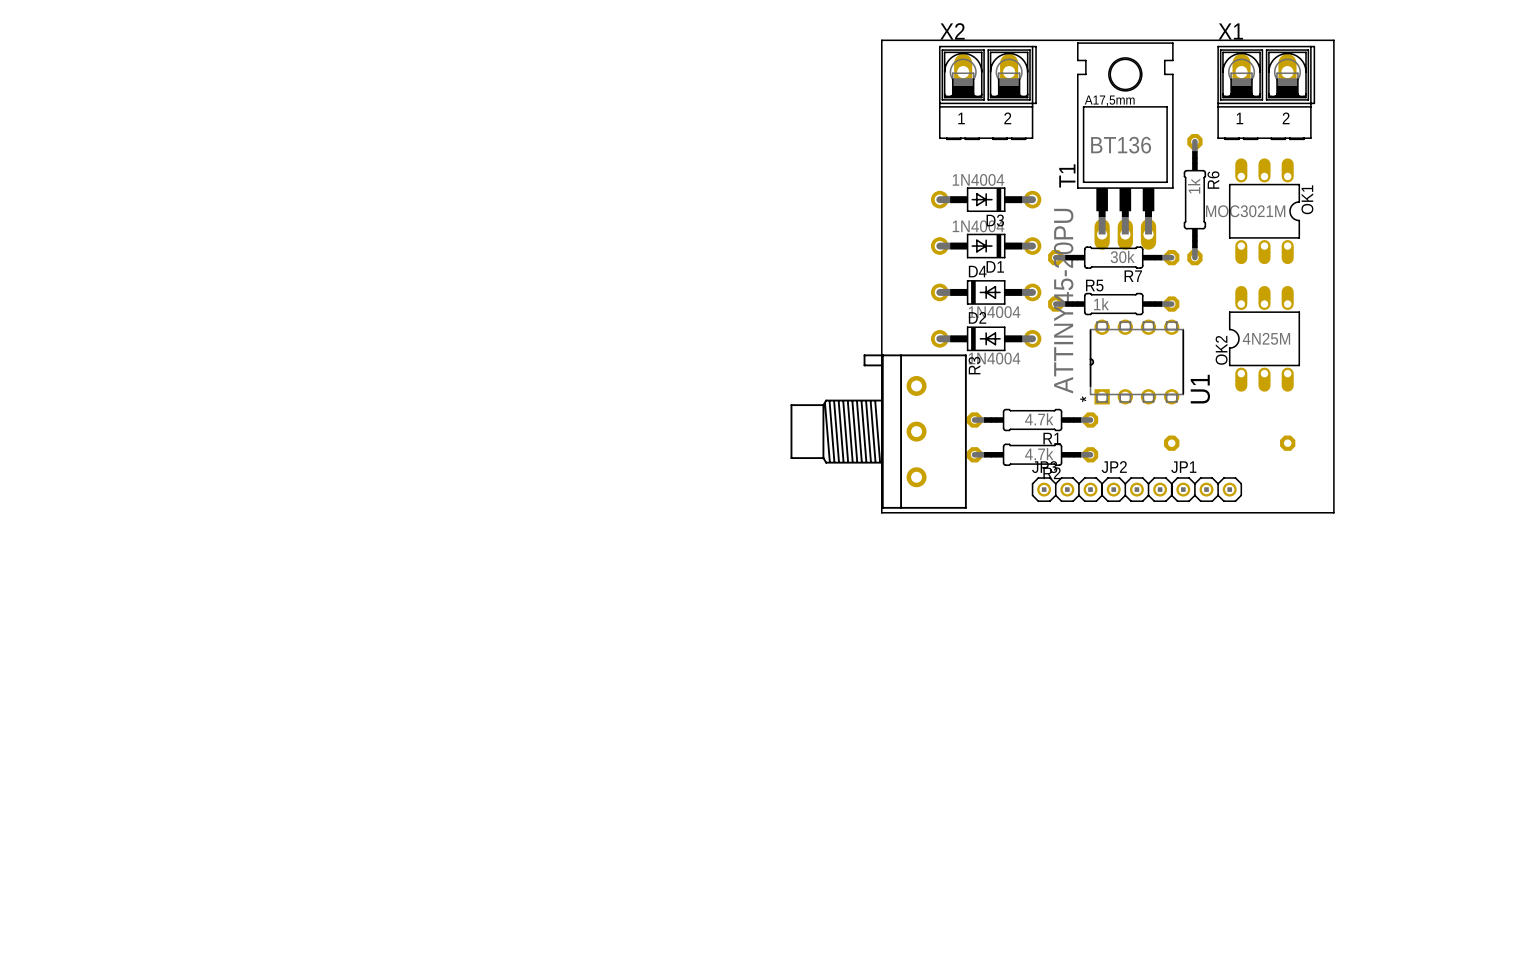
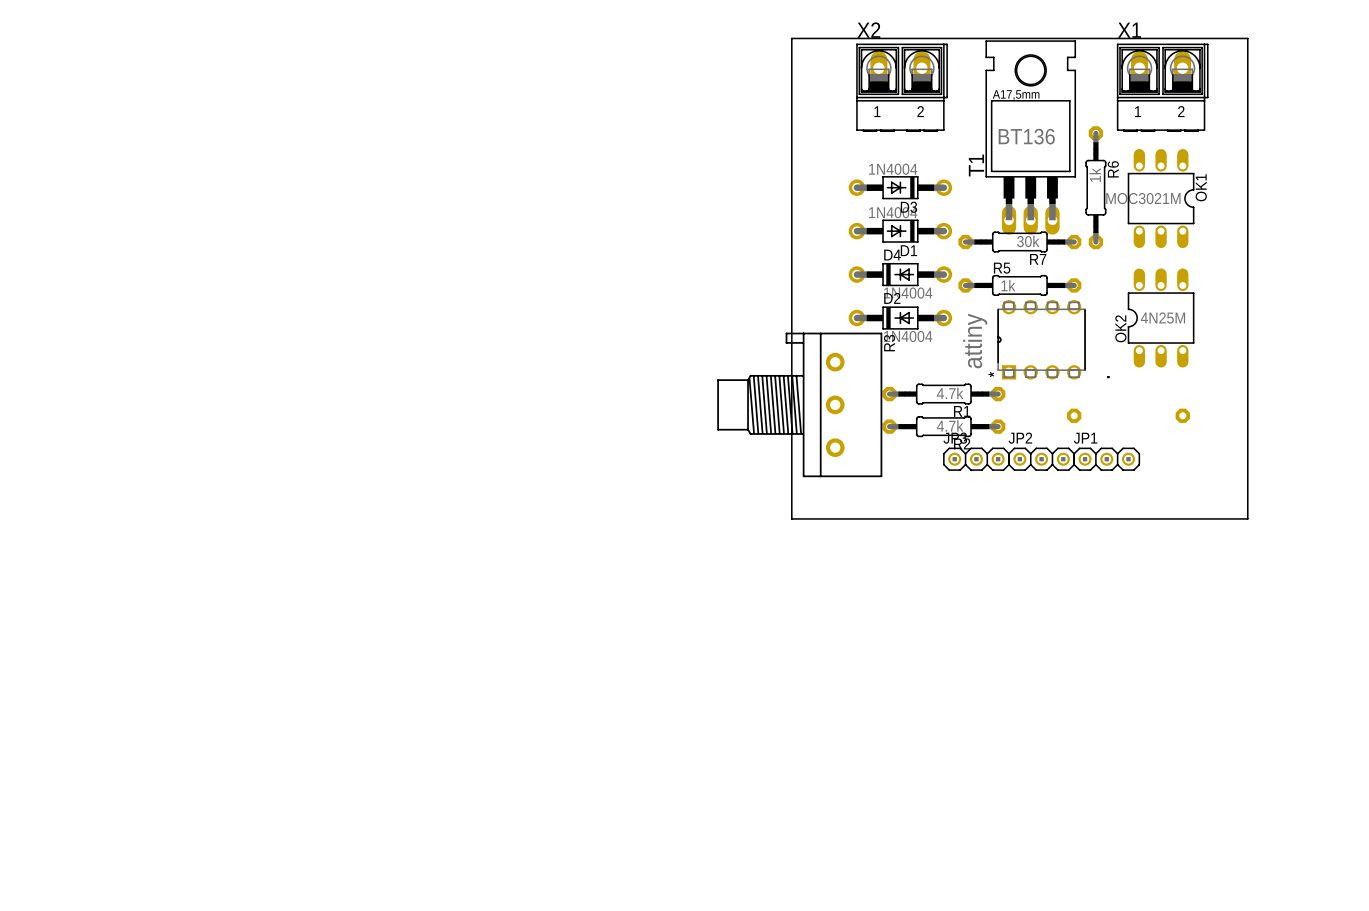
board edge: (881, 40) (881, 512) (1333, 512) (1333, 40) -> (802, 38) (791, 38) (791, 518) (1247, 518) (1247, 38) (1226, 38)
U1 value: ATTINY45-20PU (1063, 301) -> attiny (975, 340)
U1 name: U1 (1200, 389) -> . (1108, 377)

